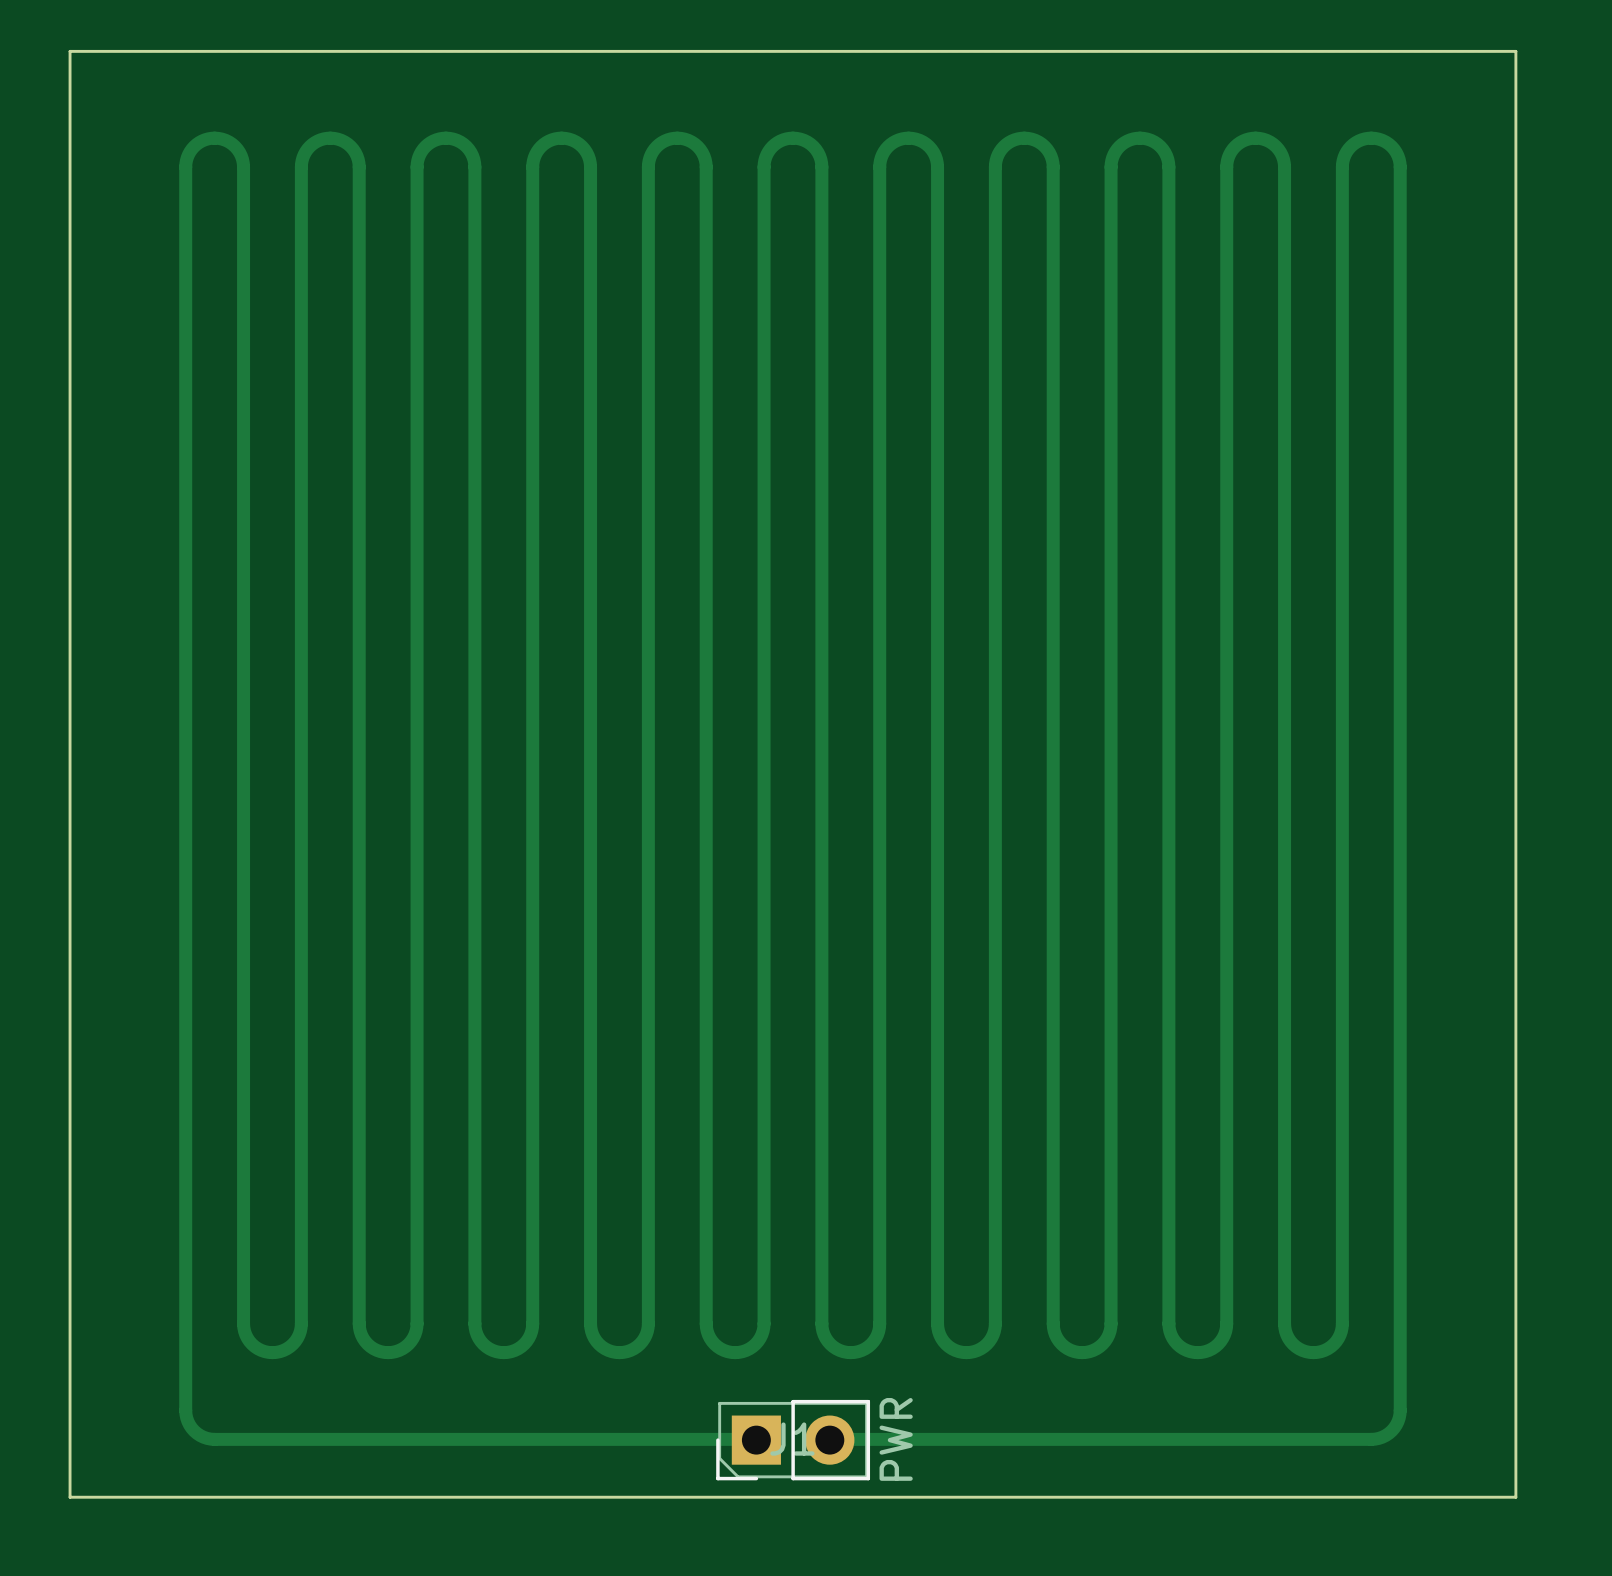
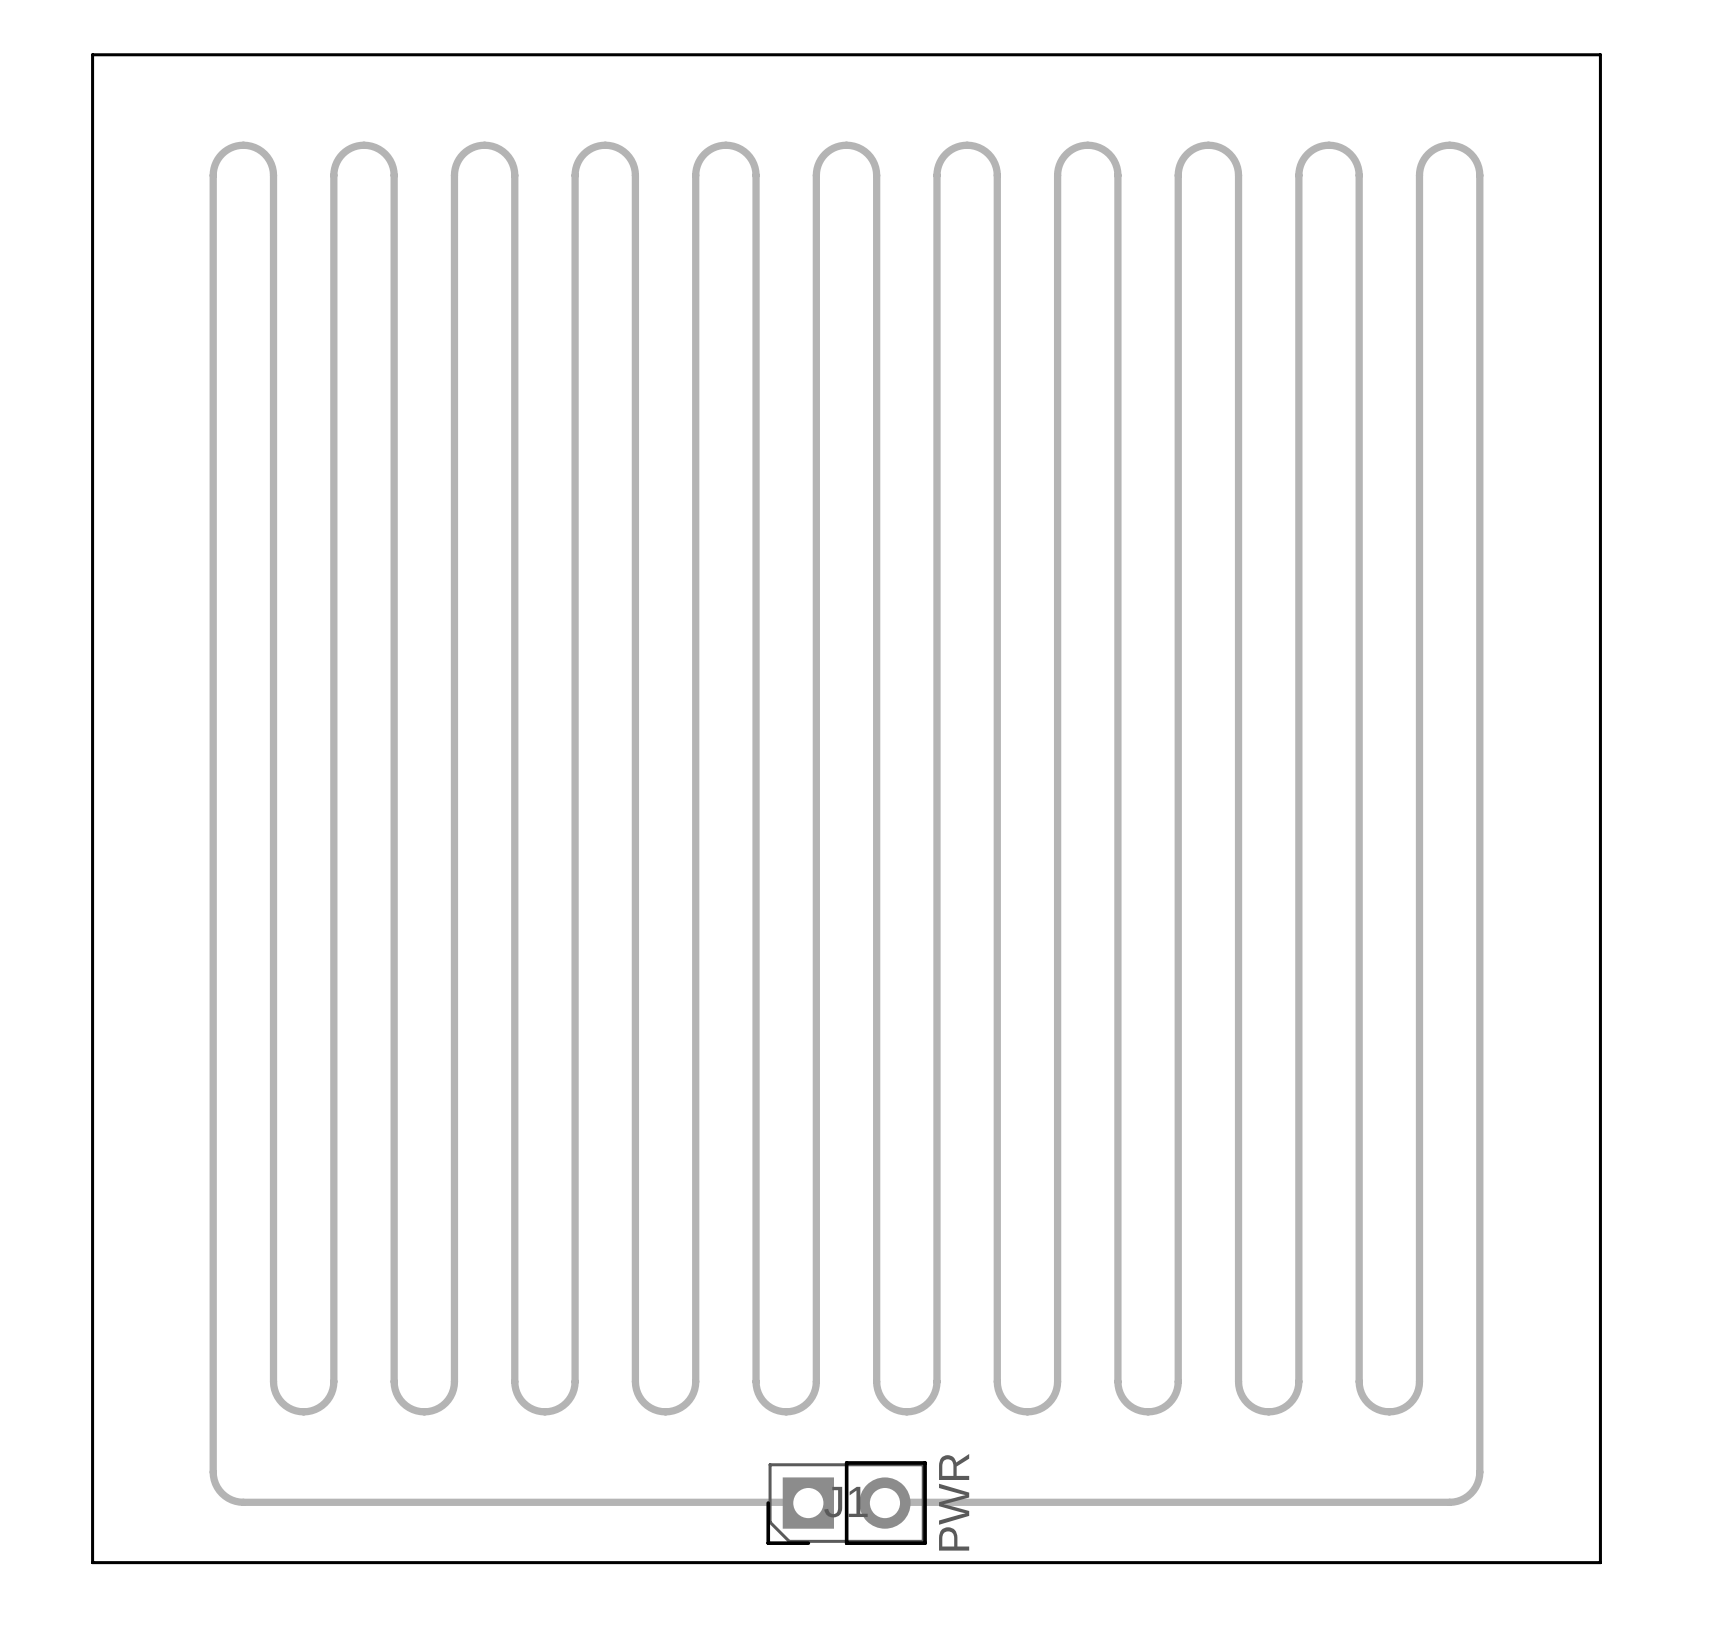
track width: thick (756, 1439) (214, 1439) (197, 1433) (187, 1421) (185, 1410) (185, 167) (190, 151) (202, 141) (214, 138) (229, 142) (239, 152) (243, 167) (243, 1323) (245, 1334) (252, 1344) (261, 1350) (272, 1352) (283, 1350) (292, 1344) (299, 1334) (301, 1323) (301, 167) (304, 154) (309, 146) (323, 138) (341, 140) (355, 152) (359, 167) (359, 1323) (361, 1334) (367, 1344) (377, 1350) (388, 1352) (399, 1350) (408, 1344) (414, 1334) (417, 1323) (417, 167) (418, 157) (423, 149) (436, 139) (453, 139) (468, 149) (474, 163) (474, 1323) (477, 1334) (483, 1344) (492, 1350) (503, 1352) (514, 1350) (524, 1344) (530, 1334) (532, 1323) (532, 167) (534, 157) (539, 149) (552, 139) (569, 139) (584, 149) (590, 163) (590, 1323) (592, 1334) (599, 1344) (608, 1350) (619, 1352) (630, 1350) (639, 1344) (646, 1334) (648, 1323) (648, 167) (652, 151) (659, 144) (667, 139) (684, 139) (697, 146) (705, 163) (706, 1323) (708, 1334) (714, 1344) (724, 1350) (735, 1352) (746, 1350) (755, 1344) (761, 1334) (764, 1323) (764, 167) (768, 151) (774, 144) (783, 139) (800, 139) (815, 149) (821, 163) (821, 1323) (824, 1334) (830, 1344) (839, 1350) (850, 1352) (861, 1350) (871, 1344) (877, 1334) (879, 1323) (879, 167) (882, 154) (888, 146) (896, 141) (912, 138) (929, 146) (937, 163) (937, 1323) (939, 1334) (946, 1344) (955, 1350) (966, 1352) (977, 1350) (986, 1344) (993, 1334) (995, 1323) (995, 167) (997, 157) (1001, 149) (1008, 142) (1017, 138) (1028, 138) (1044, 146) (1052, 163) (1053, 1323) (1055, 1334) (1061, 1344) (1071, 1350) (1082, 1352) (1093, 1350) (1102, 1344) (1108, 1334) (1111, 1323) (1111, 163) (1113, 154) (1121, 144) (1130, 139) (1139, 138) (1151, 140) (1160, 146) (1168, 163) (1168, 1323) (1171, 1334) (1177, 1344) (1186, 1350) (1197, 1352) (1208, 1350) (1218, 1344) (1224, 1334) (1226, 1323) (1226, 163) (1229, 154) (1235, 146) (1243, 141) (1252, 138) (1263, 139) (1273, 144) (1283, 159) (1284, 1323) (1286, 1334) (1293, 1344) (1302, 1350) (1313, 1352) (1324, 1350) (1333, 1344) (1340, 1334) (1342, 1323) (1342, 163) (1345, 154) (1350, 146) (1358, 141) (1368, 138) (1385, 142) (1398, 155) (1400, 167) (1400, 1410) (1398, 1421) (1388, 1433) (1371, 1439) (830, 1439) -> thin (807, 1502) (243, 1502) (231, 1500) (225, 1496) (215, 1483) (213, 1472) (213, 175) (217, 159) (230, 148) (243, 145) (258, 149) (269, 160) (273, 175) (273, 1381) (275, 1393) (282, 1403) (292, 1409) (303, 1411) (315, 1409) (325, 1403) (331, 1393) (333, 1381) (333, 175) (336, 162) (342, 154) (357, 146) (375, 147) (385, 154) (390, 160) (394, 175) (394, 1381) (396, 1393) (402, 1403) (412, 1409) (424, 1411) (435, 1409) (445, 1403) (452, 1393) (454, 1381) (454, 175) (456, 165) (461, 156) (474, 146) (492, 146) (502, 151) (508, 157) (514, 171) (514, 1381) (517, 1393) (523, 1403) (533, 1409) (544, 1411) (556, 1409) (566, 1403) (572, 1393) (575, 1381) (575, 175) (576, 165) (581, 156) (595, 146) (613, 146) (620, 149) (629, 157) (635, 171) (635, 1381) (637, 1393) (644, 1403) (654, 1409) (665, 1411) (677, 1409) (686, 1403) (693, 1393) (695, 1381) (695, 175) (700, 159) (707, 151) (715, 146) (733, 146) (747, 154) (751, 160) (755, 171) (756, 1381) (758, 1393) (764, 1403) (774, 1409) (786, 1411) (797, 1409) (807, 1403) (814, 1393) (816, 1381) (816, 175) (820, 159) (827, 151) (836, 146) (854, 146) (864, 151) (870, 157) (876, 171) (876, 1381) (878, 1393) (885, 1403) (895, 1409) (906, 1411) (918, 1409) (928, 1403) (934, 1393) (936, 1381) (936, 175) (939, 162) (945, 154) (954, 148) (971, 145) (982, 149) (988, 154) (993, 160) (997, 171) (997, 1381) (999, 1393) (1006, 1403) (1015, 1409) (1027, 1411) (1038, 1409) (1048, 1403) (1055, 1393) (1057, 1381) (1057, 175) (1059, 165) (1064, 156) (1071, 149) (1081, 146) (1091, 145) (1102, 149) (1109, 154) (1115, 163) (1117, 171) (1117, 1381) (1120, 1393) (1126, 1403) (1136, 1409) (1148, 1411) (1159, 1409) (1169, 1403) (1175, 1393) (1178, 1381) (1178, 172) (1181, 162) (1189, 151) (1198, 146) (1208, 145) (1219, 147) (1229, 154) (1236, 163) (1238, 171) (1238, 1381) (1240, 1393) (1247, 1403) (1257, 1409) (1268, 1411) (1280, 1409) (1290, 1403) (1296, 1393) (1298, 1381) (1299, 172) (1301, 162) (1307, 154) (1315, 148) (1325, 145) (1336, 146) (1347, 151) (1352, 157) (1358, 167) (1359, 1381) (1361, 1393) (1368, 1403) (1377, 1409) (1389, 1411) (1400, 1409) (1410, 1403) (1417, 1393) (1419, 1381) (1419, 172) (1422, 162) (1428, 154) (1436, 148) (1446, 145) (1464, 149) (1473, 157) (1477, 163) (1479, 175) (1479, 1472) (1477, 1483) (1468, 1496) (1457, 1501) (1449, 1502) (885, 1502)

